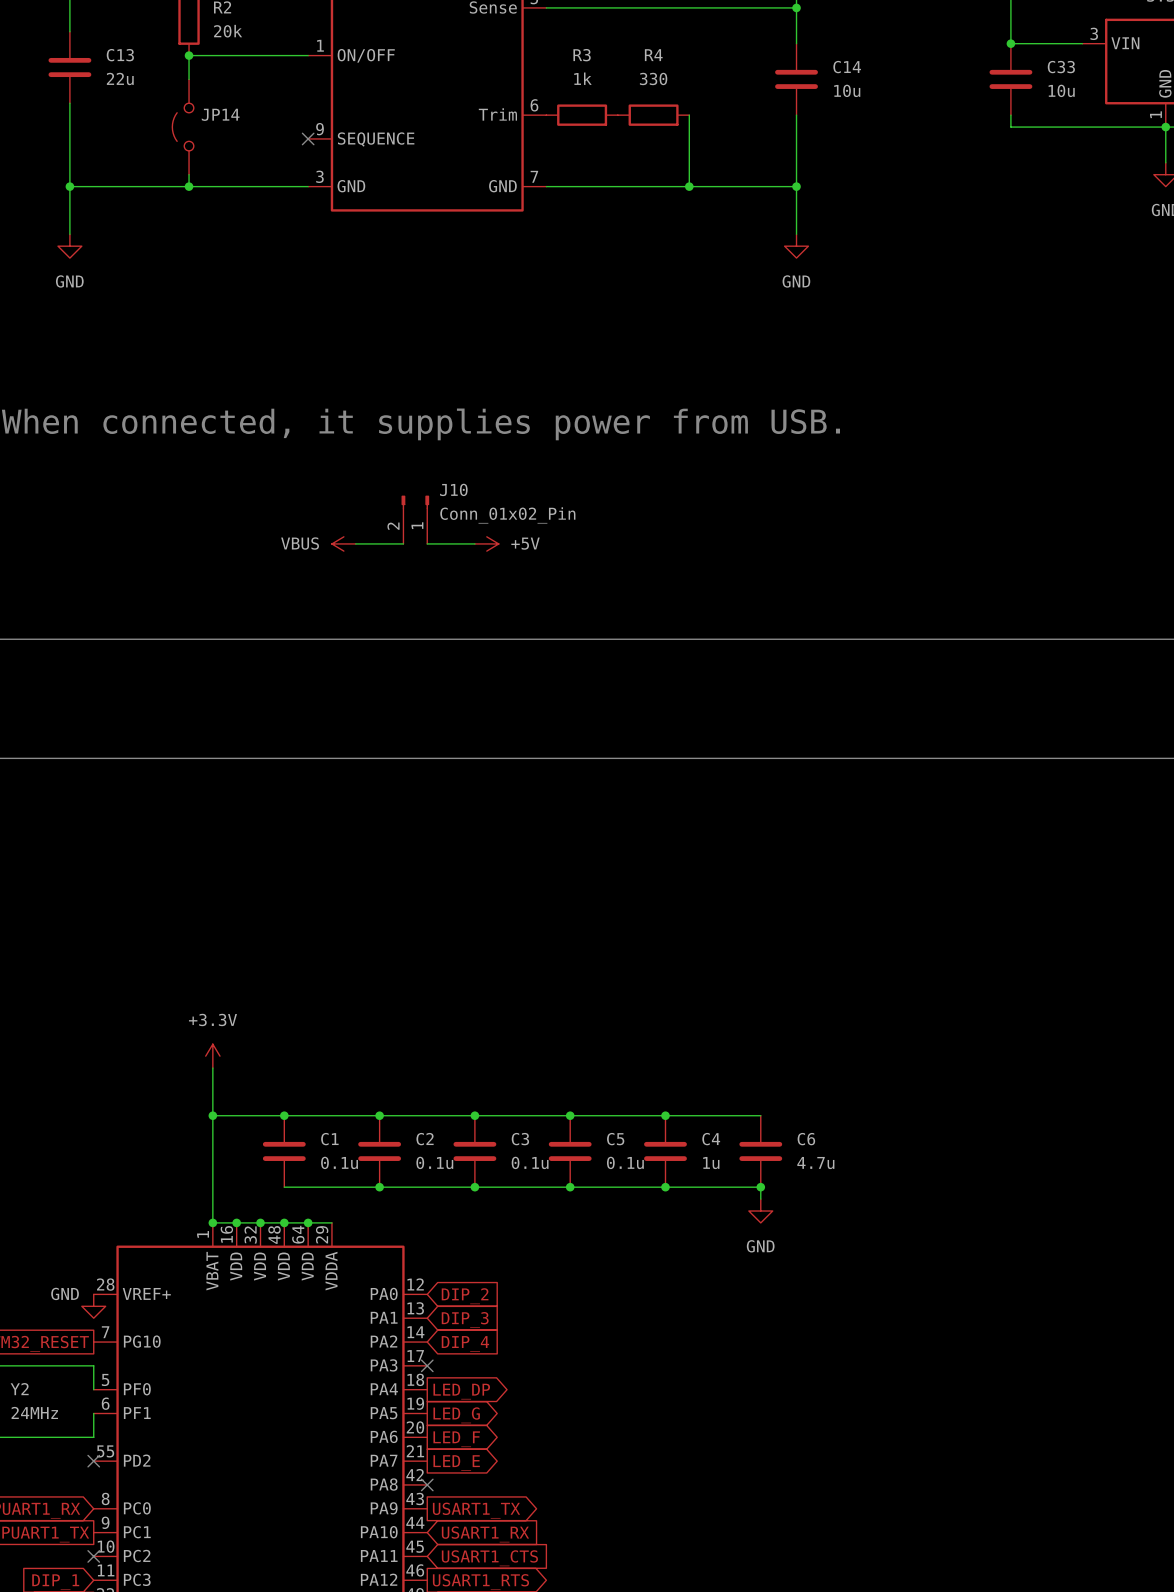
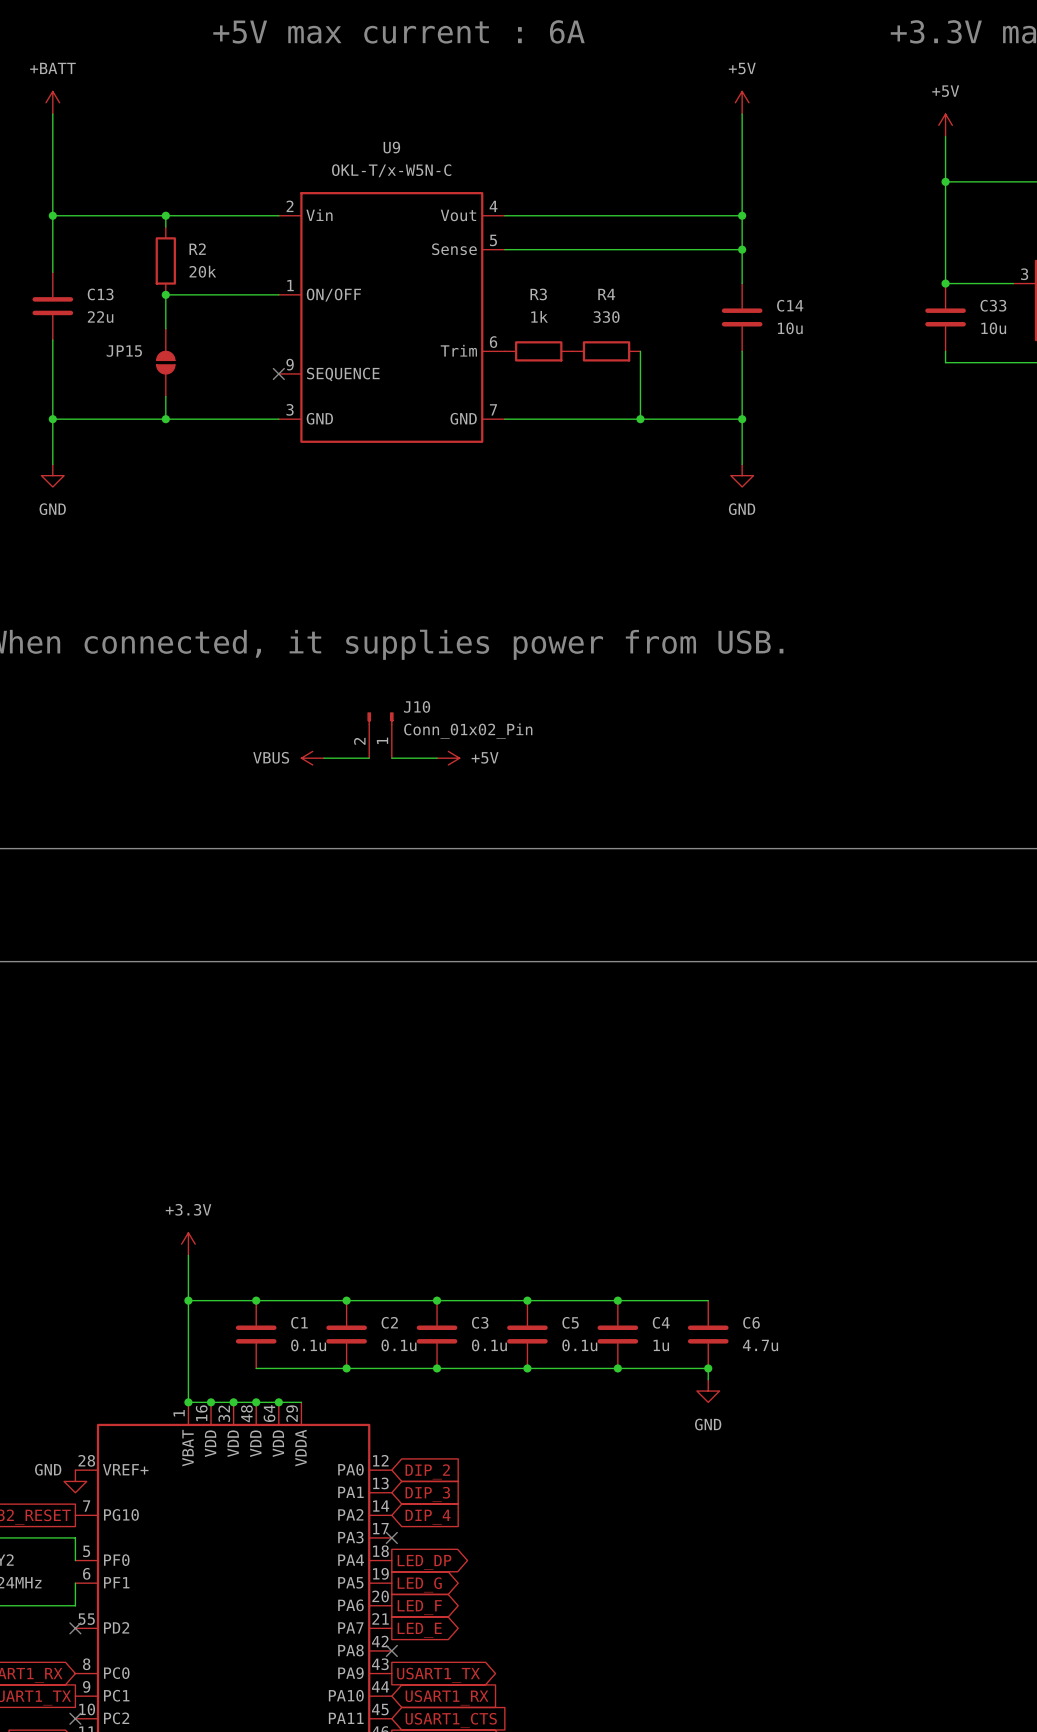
JP14: (183, 127) -> none
JP15: none -> (165, 362)

